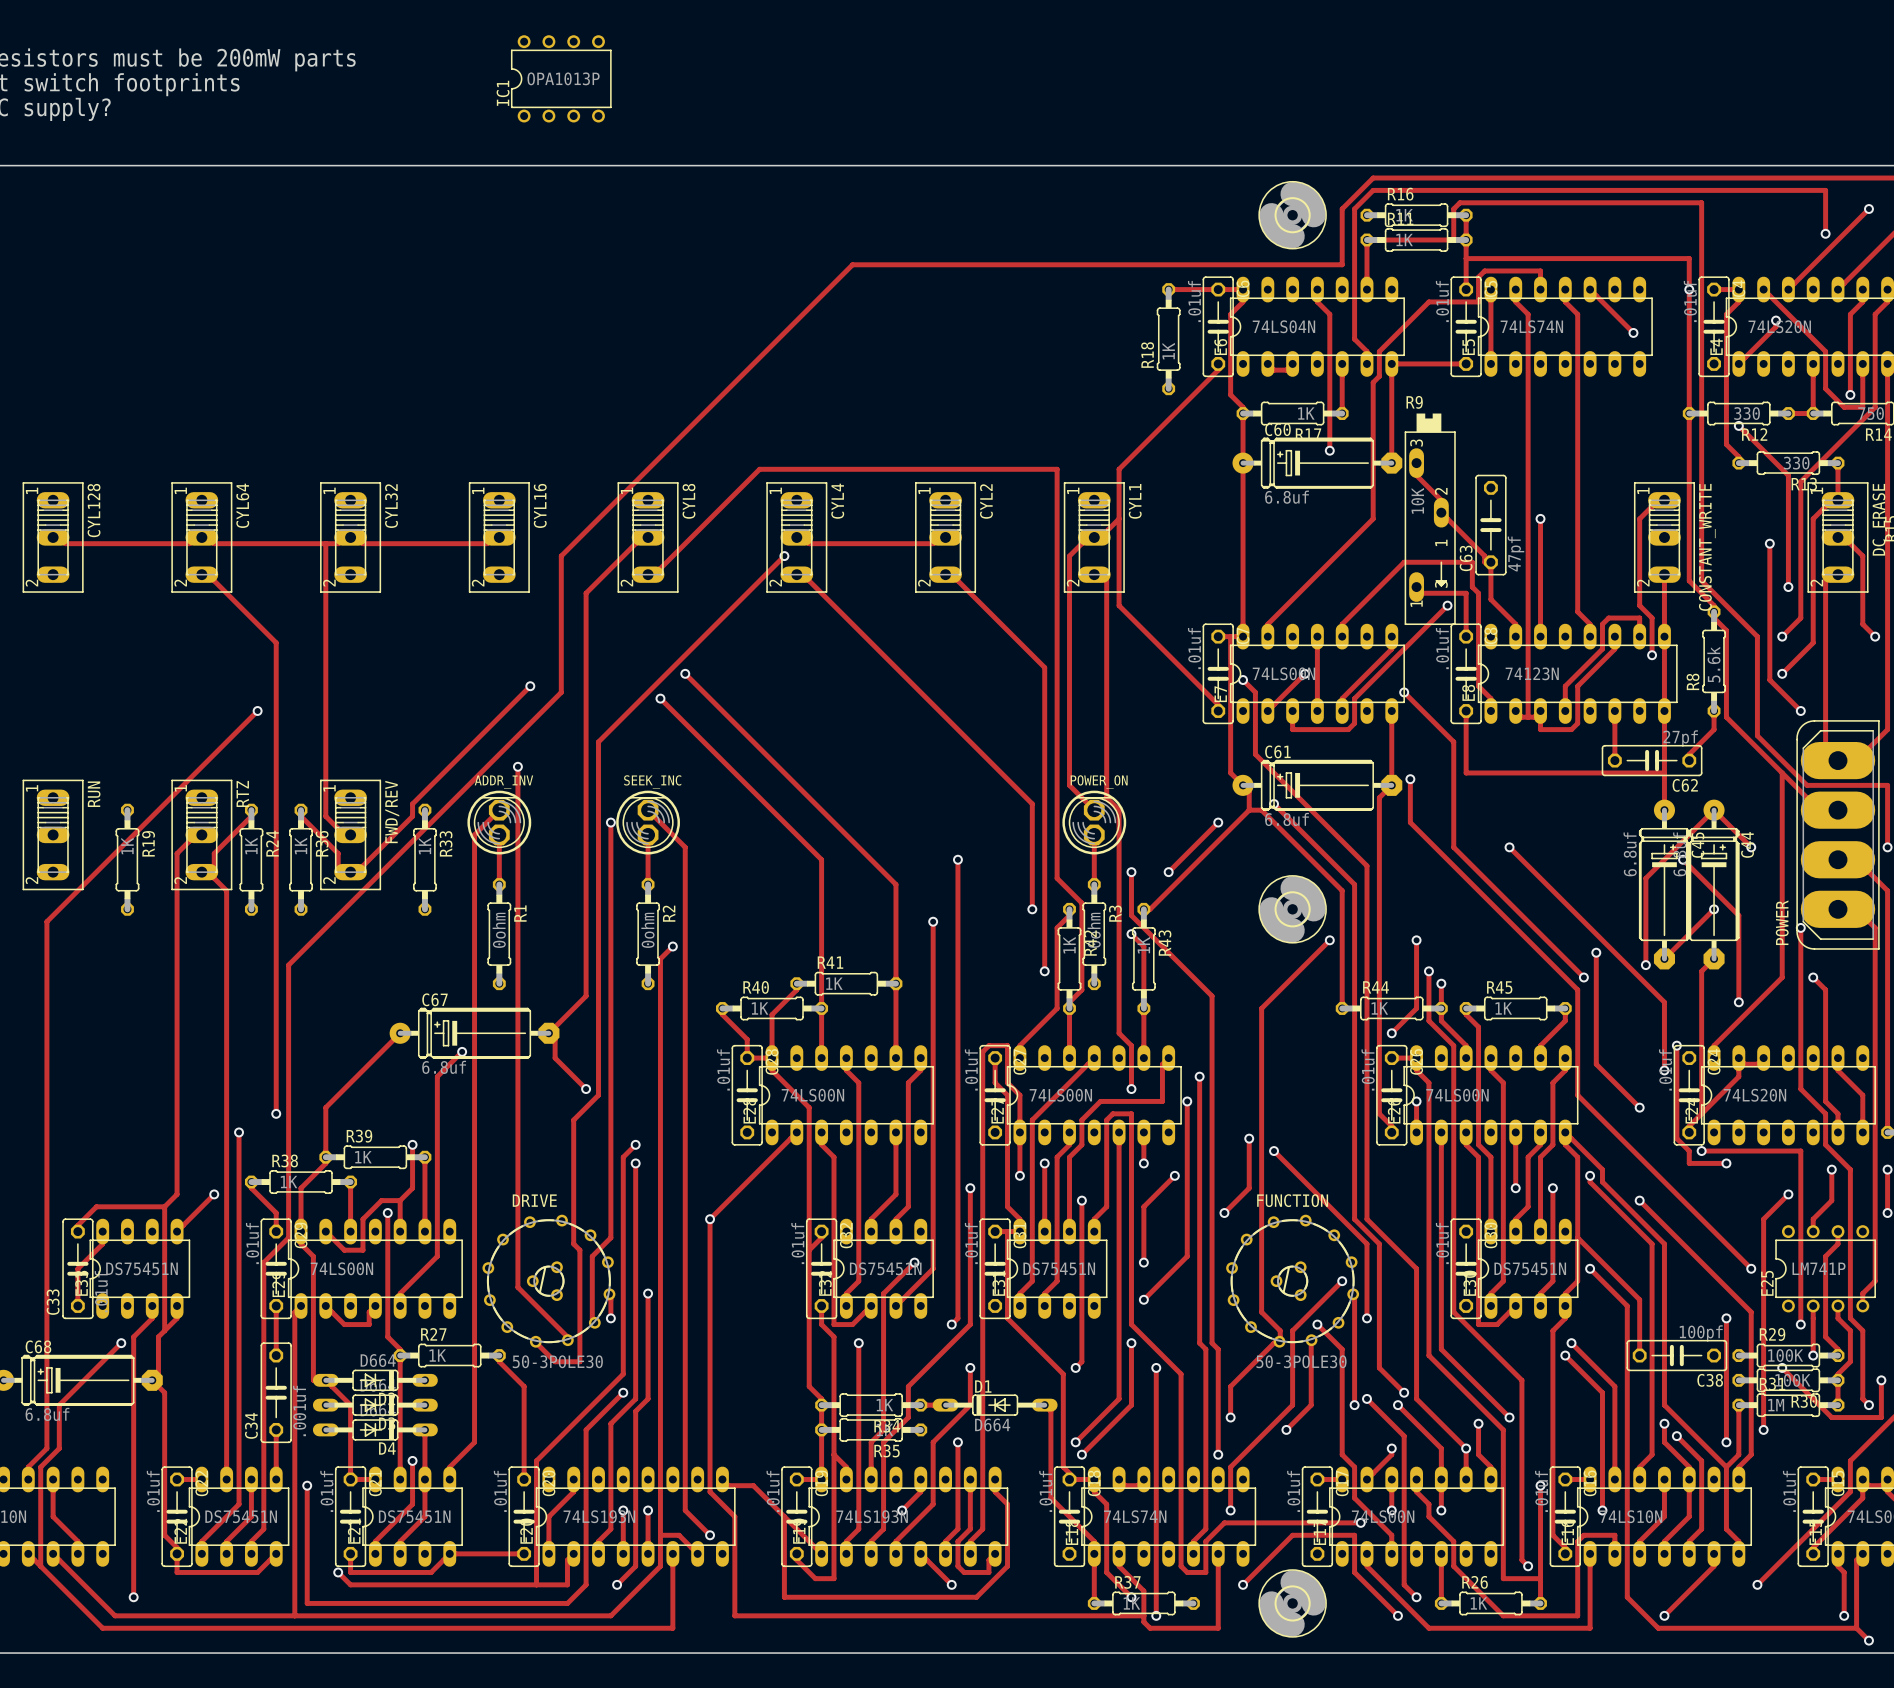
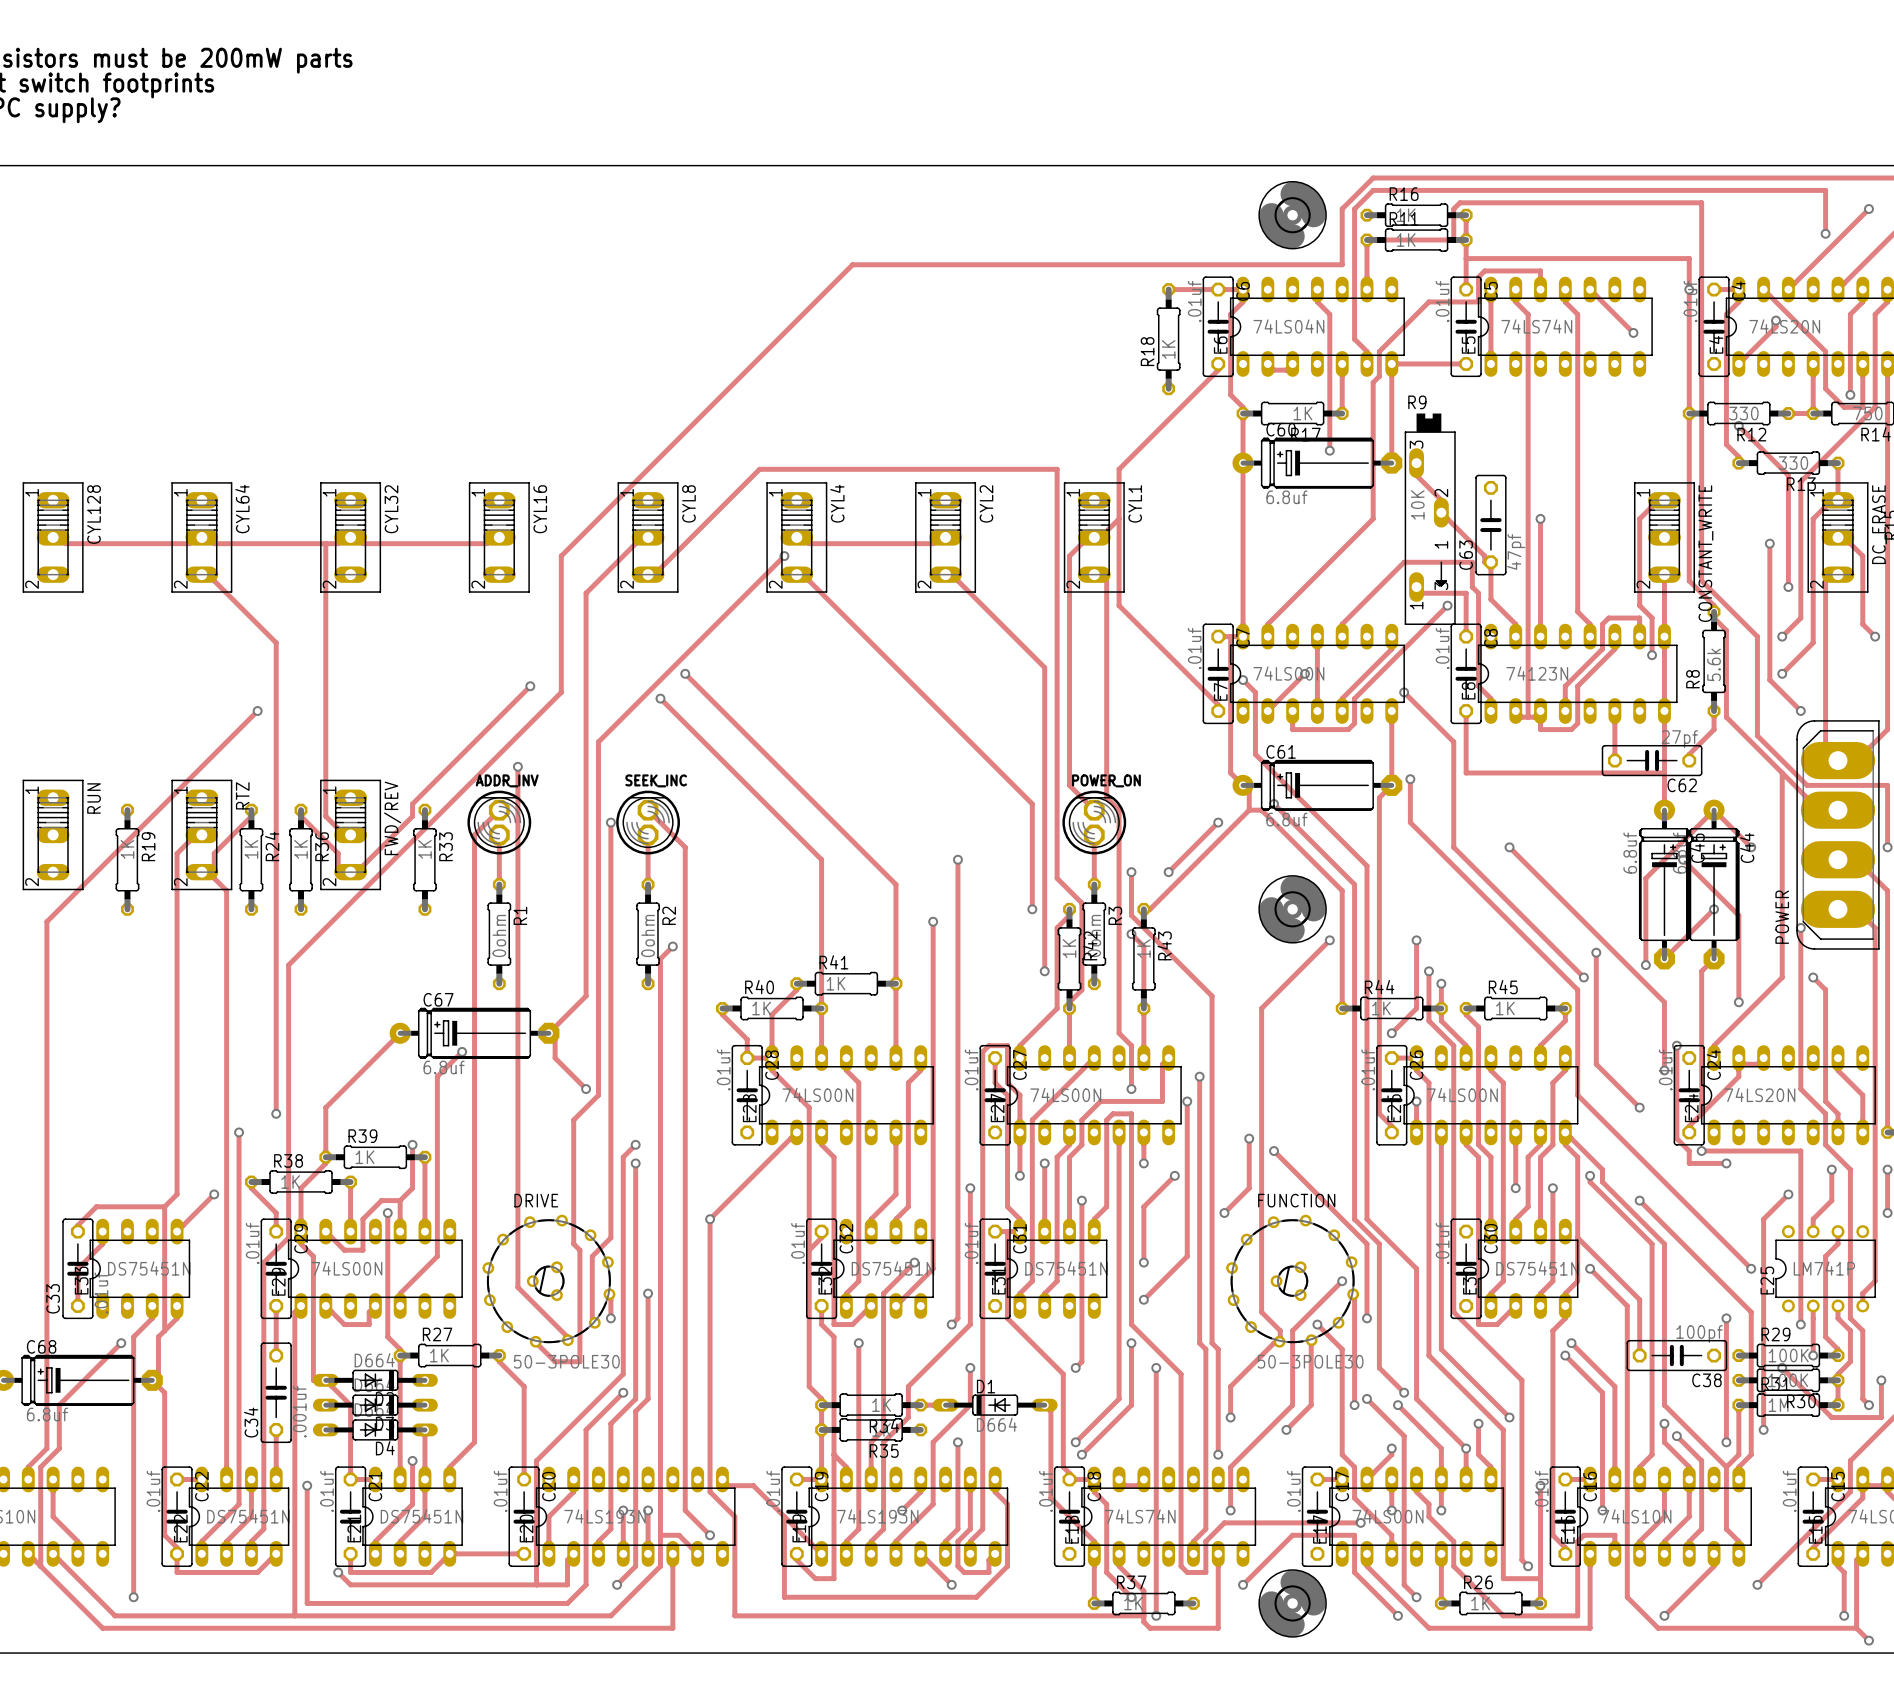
IC1: OPA1013P (561, 78) -> none

